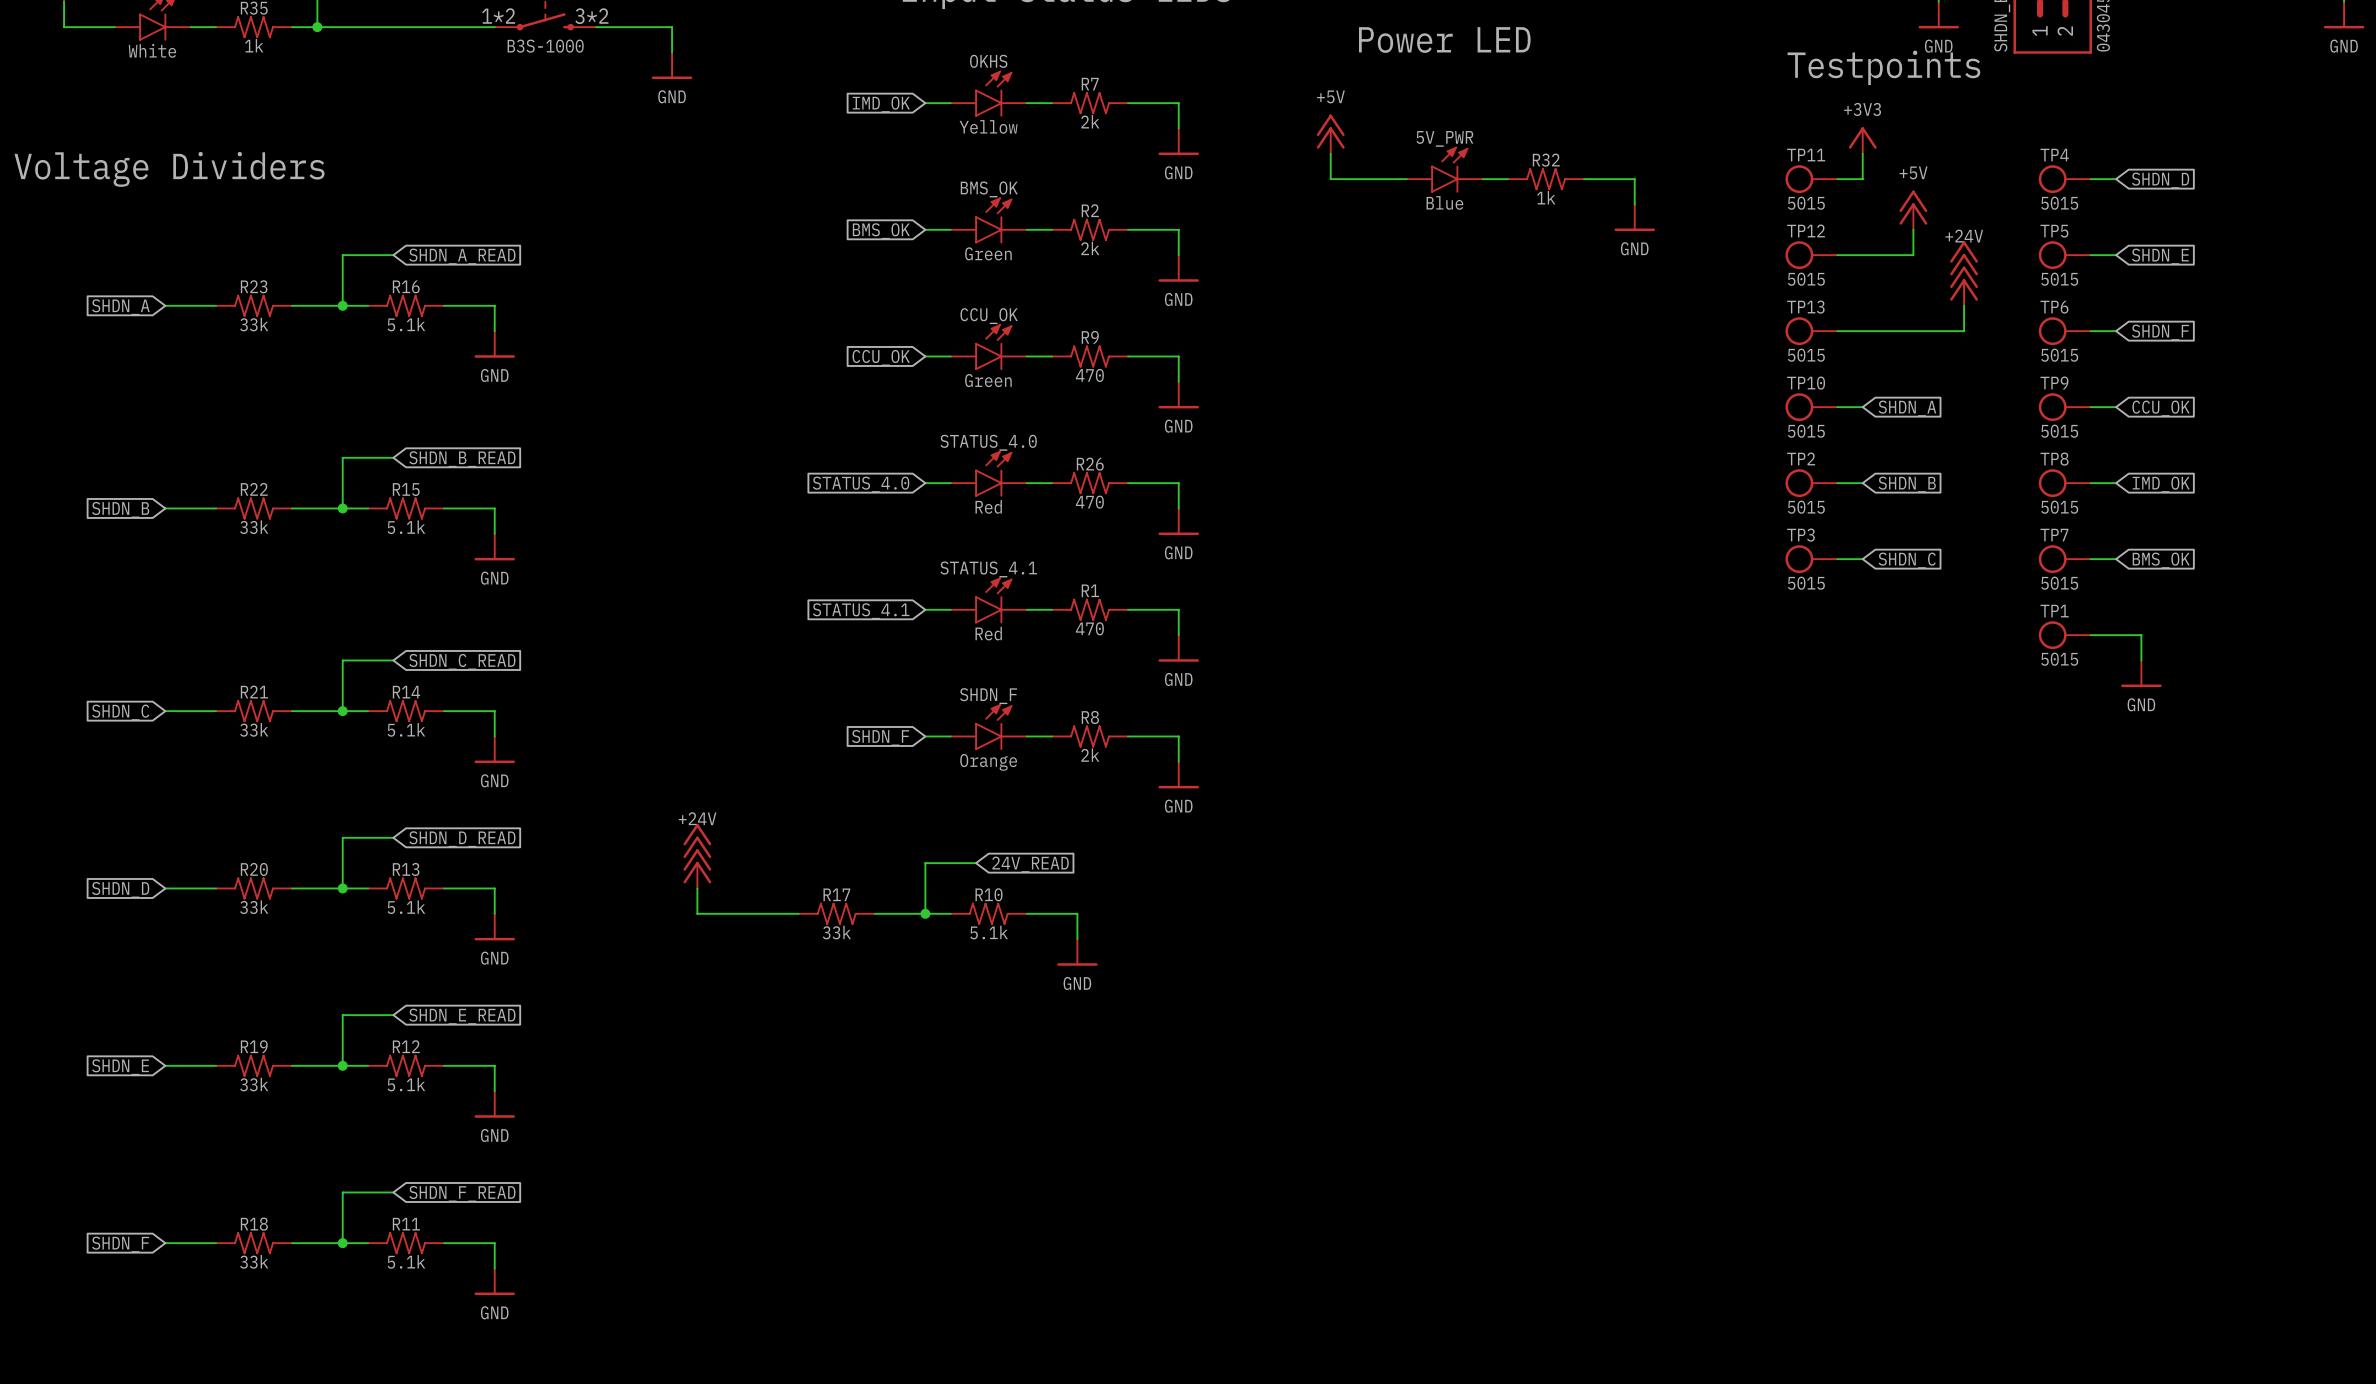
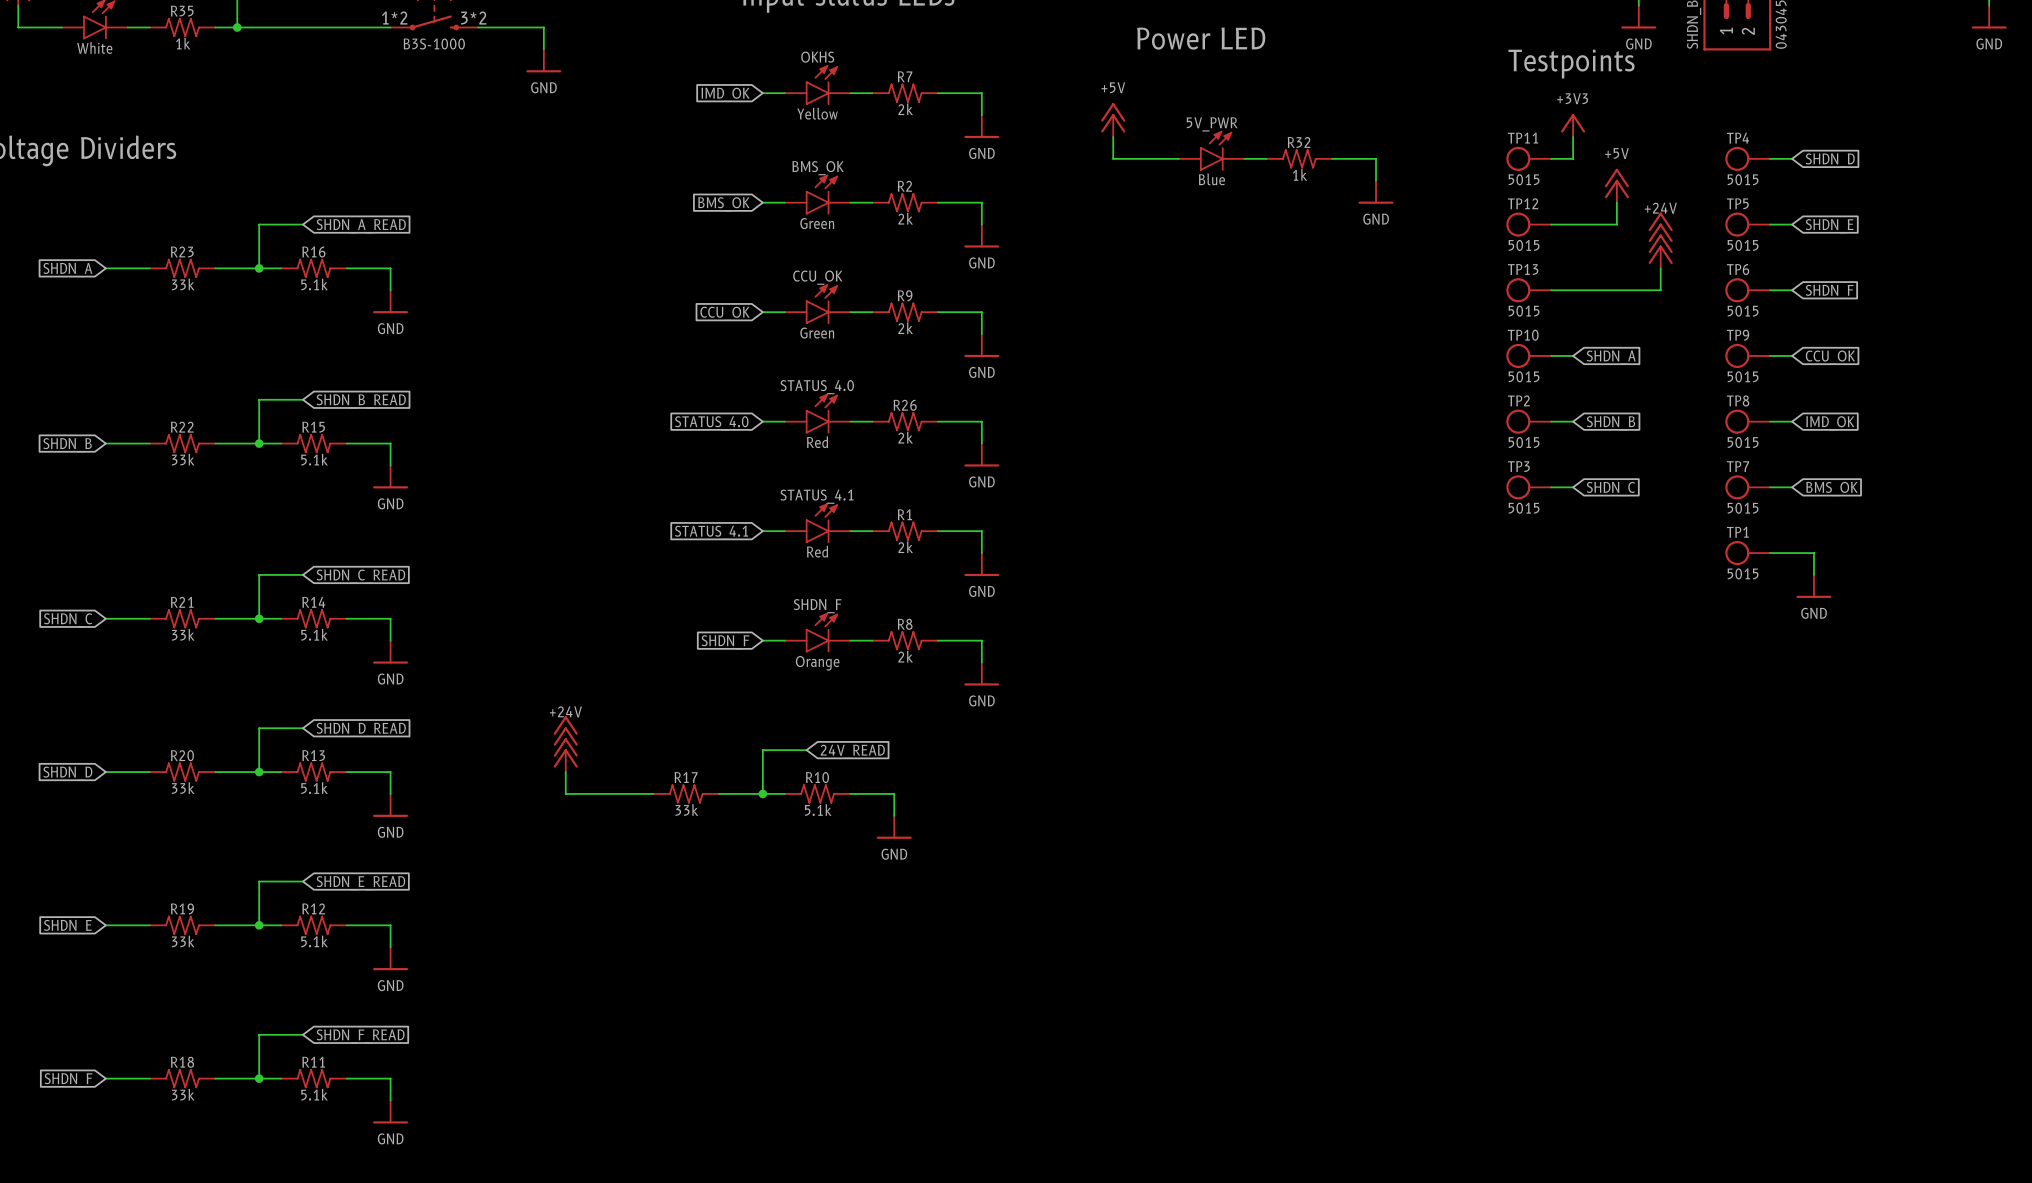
R9 text: 470 (1089, 375) -> 2k (905, 328)
R26 text: 470 (1089, 502) -> 2k (905, 437)
R1 text: 470 (1089, 628) -> 2k (905, 547)

